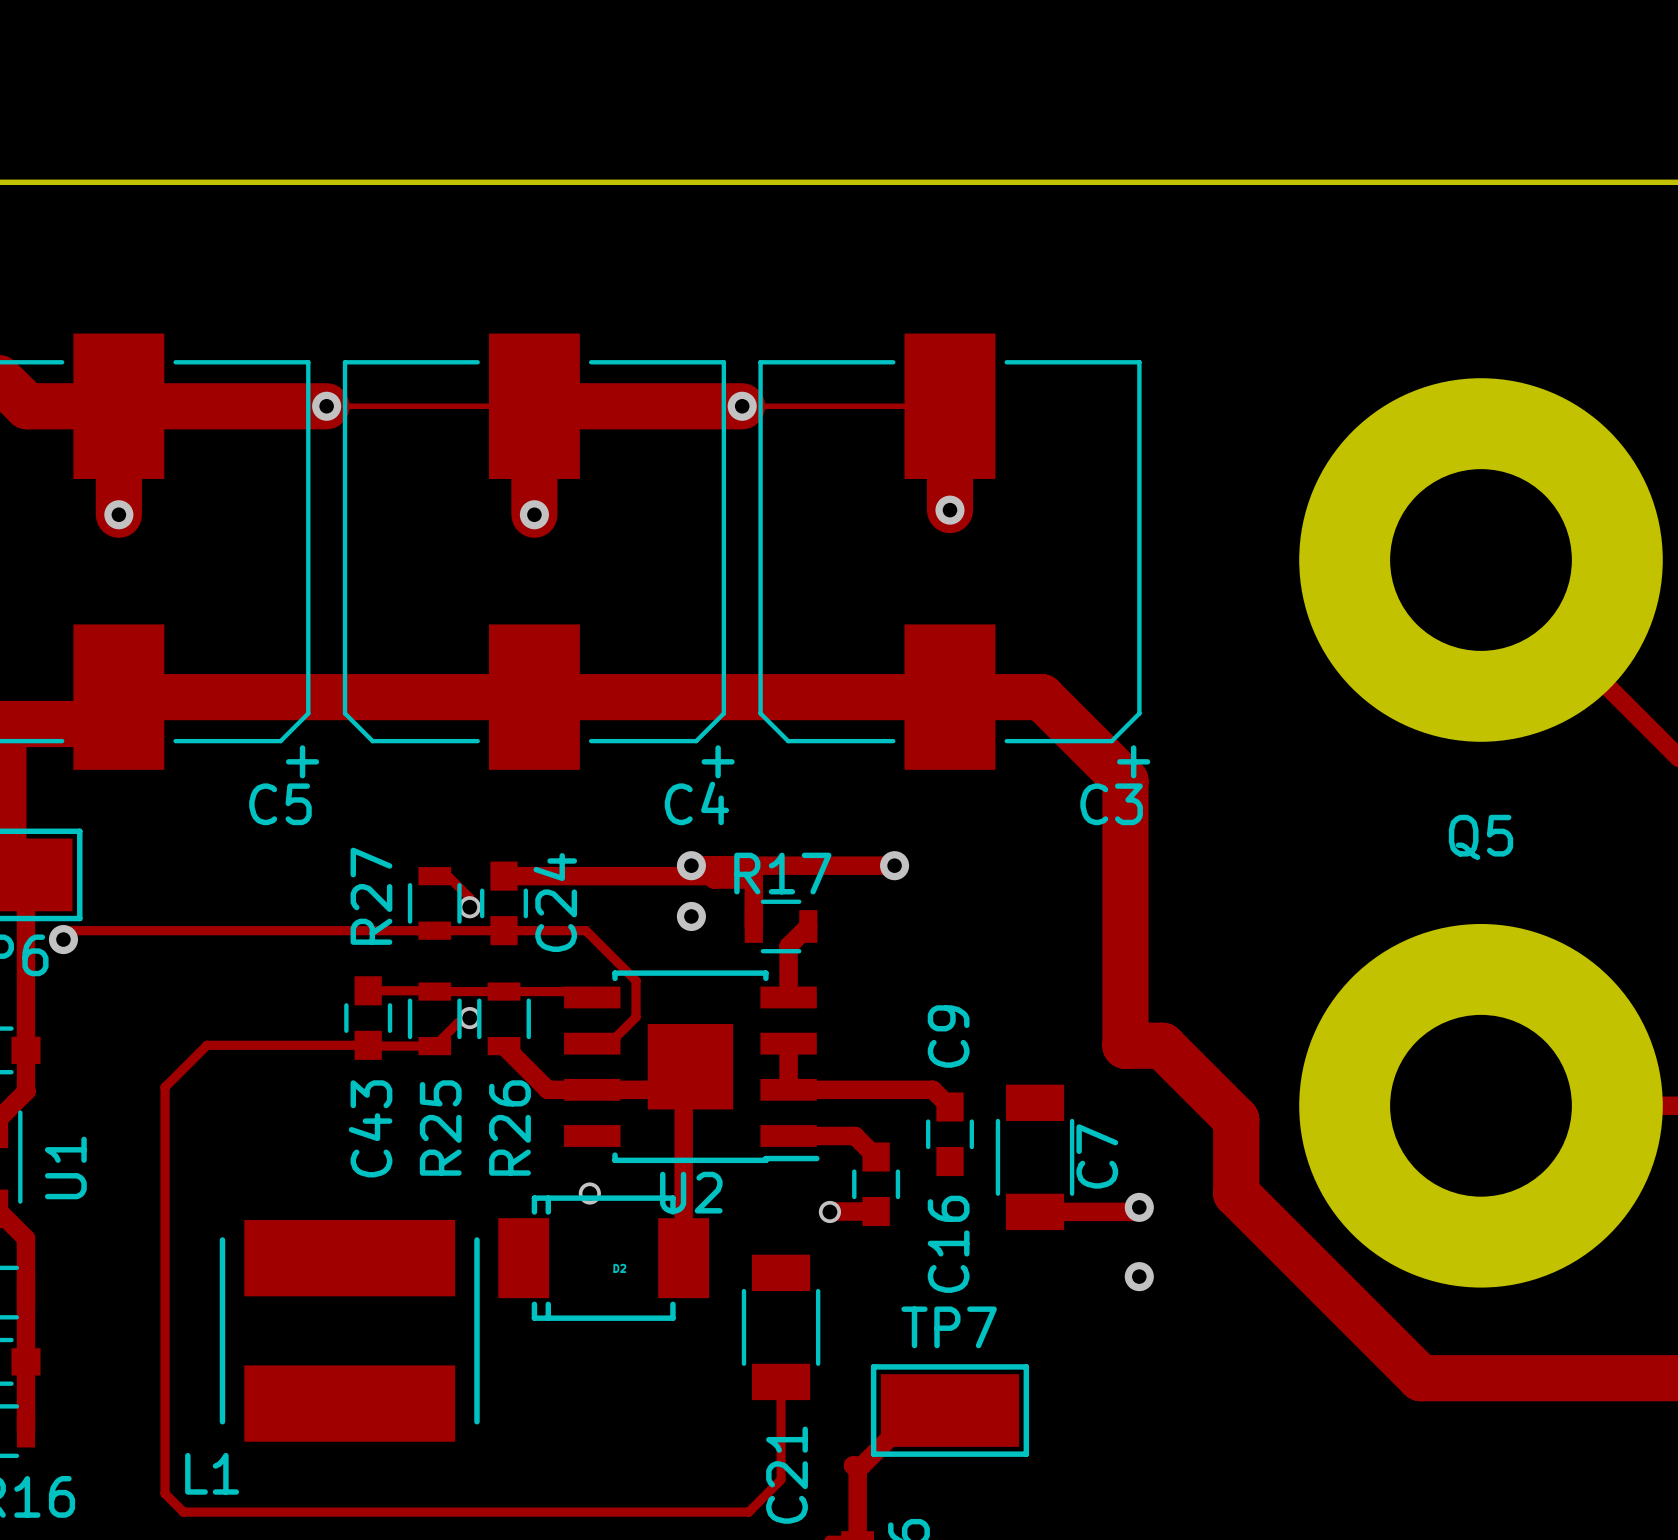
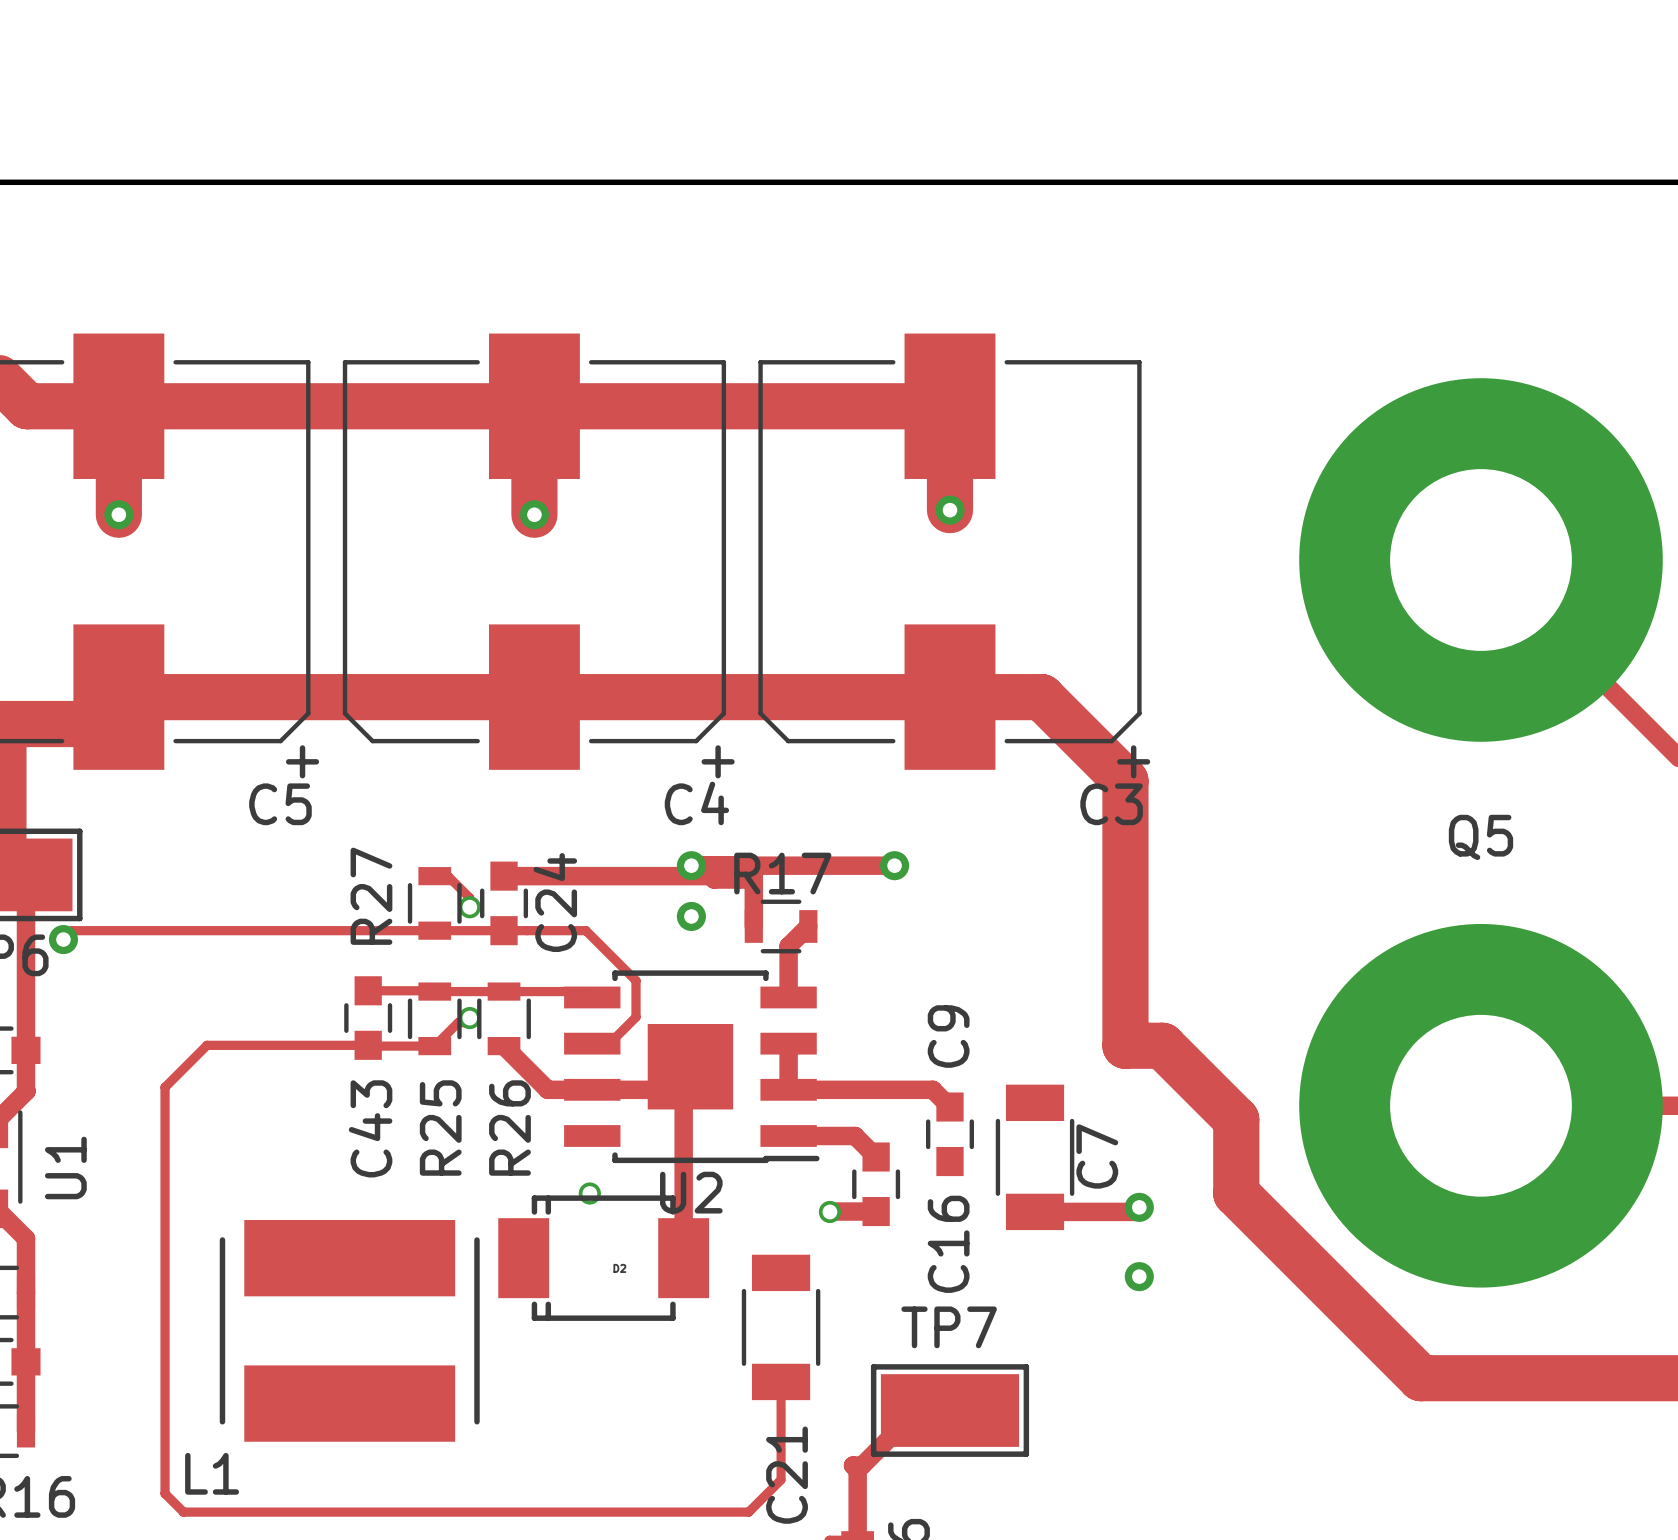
track width: thin (326, 406) (534, 406) -> thick (326, 406) (534, 406)
via: (326, 406) -> none
track width: thin (742, 406) (949, 406) -> thick (742, 406) (949, 406)
via: (742, 406) -> none

